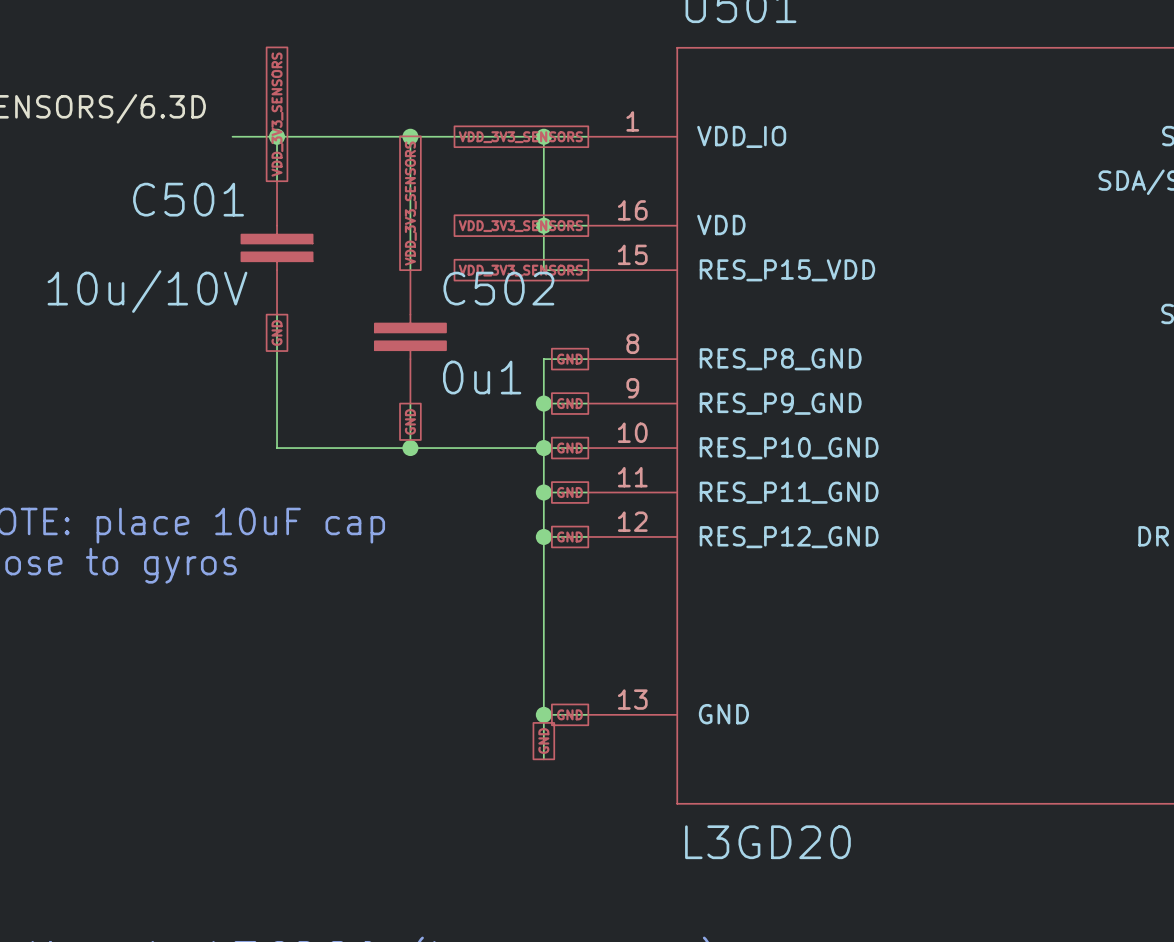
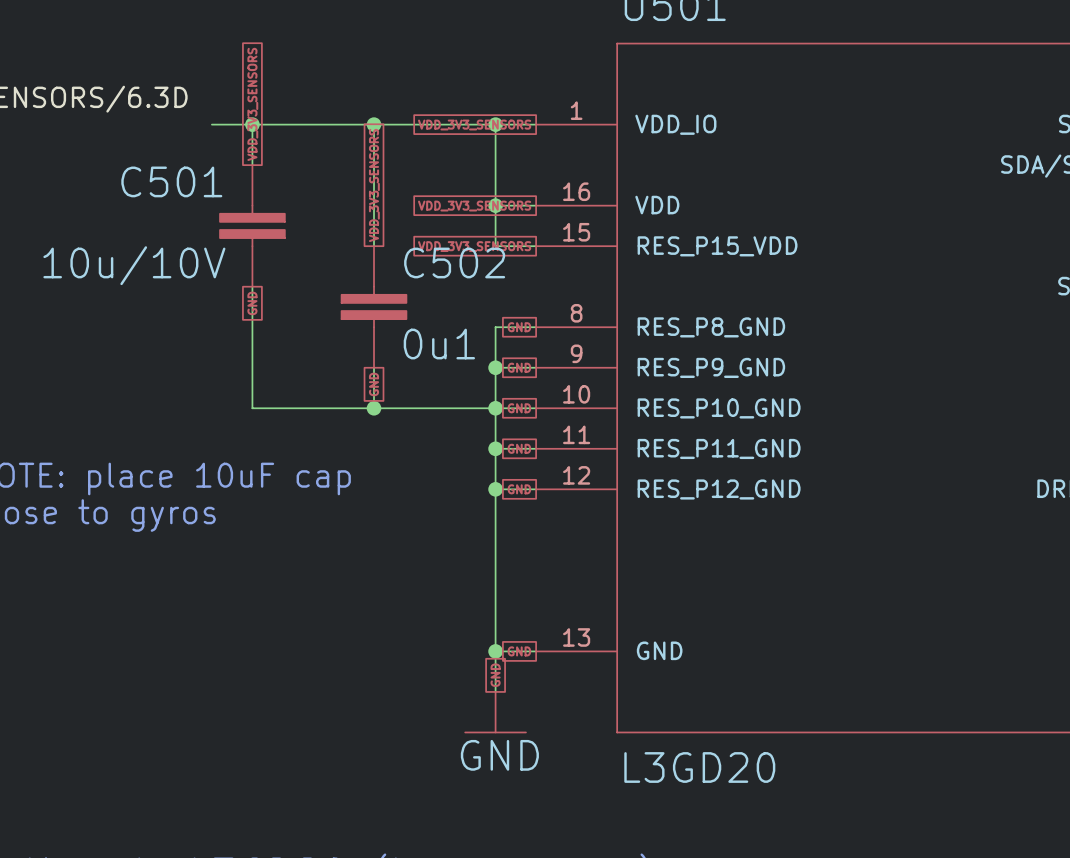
power symbol: none -> GND (495, 712)

